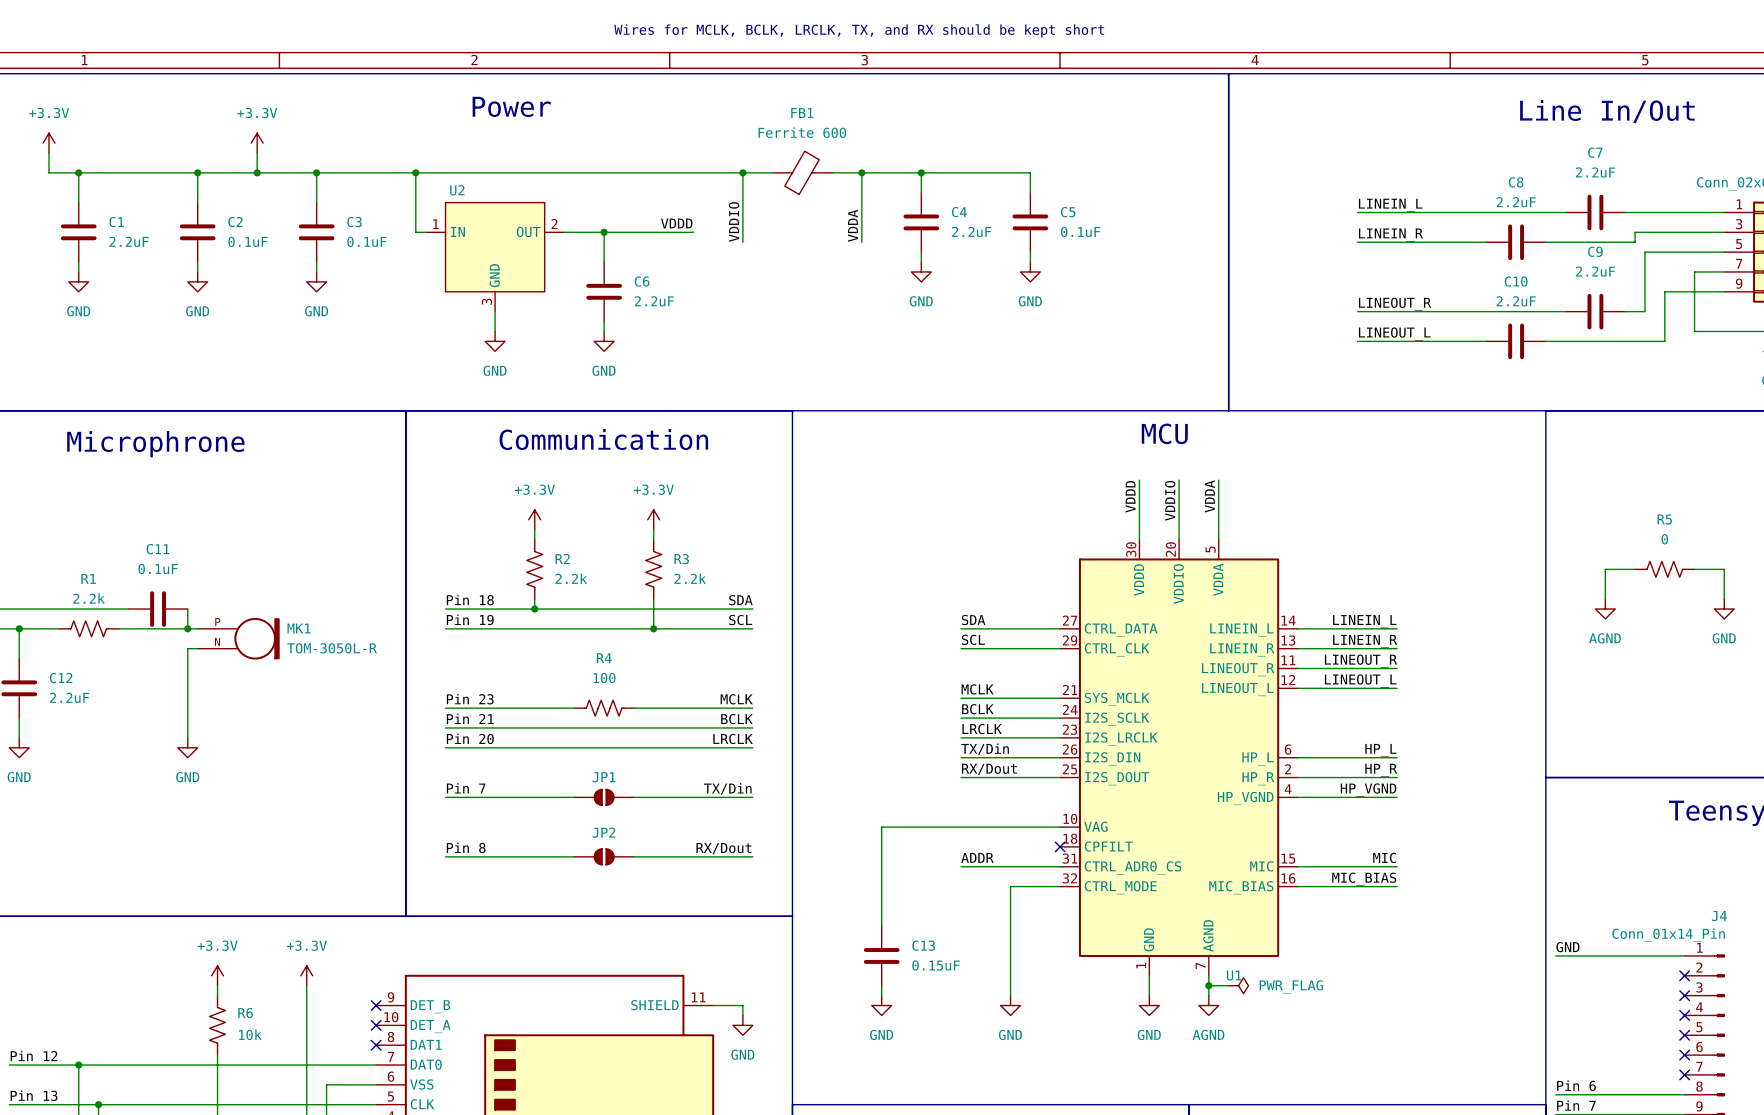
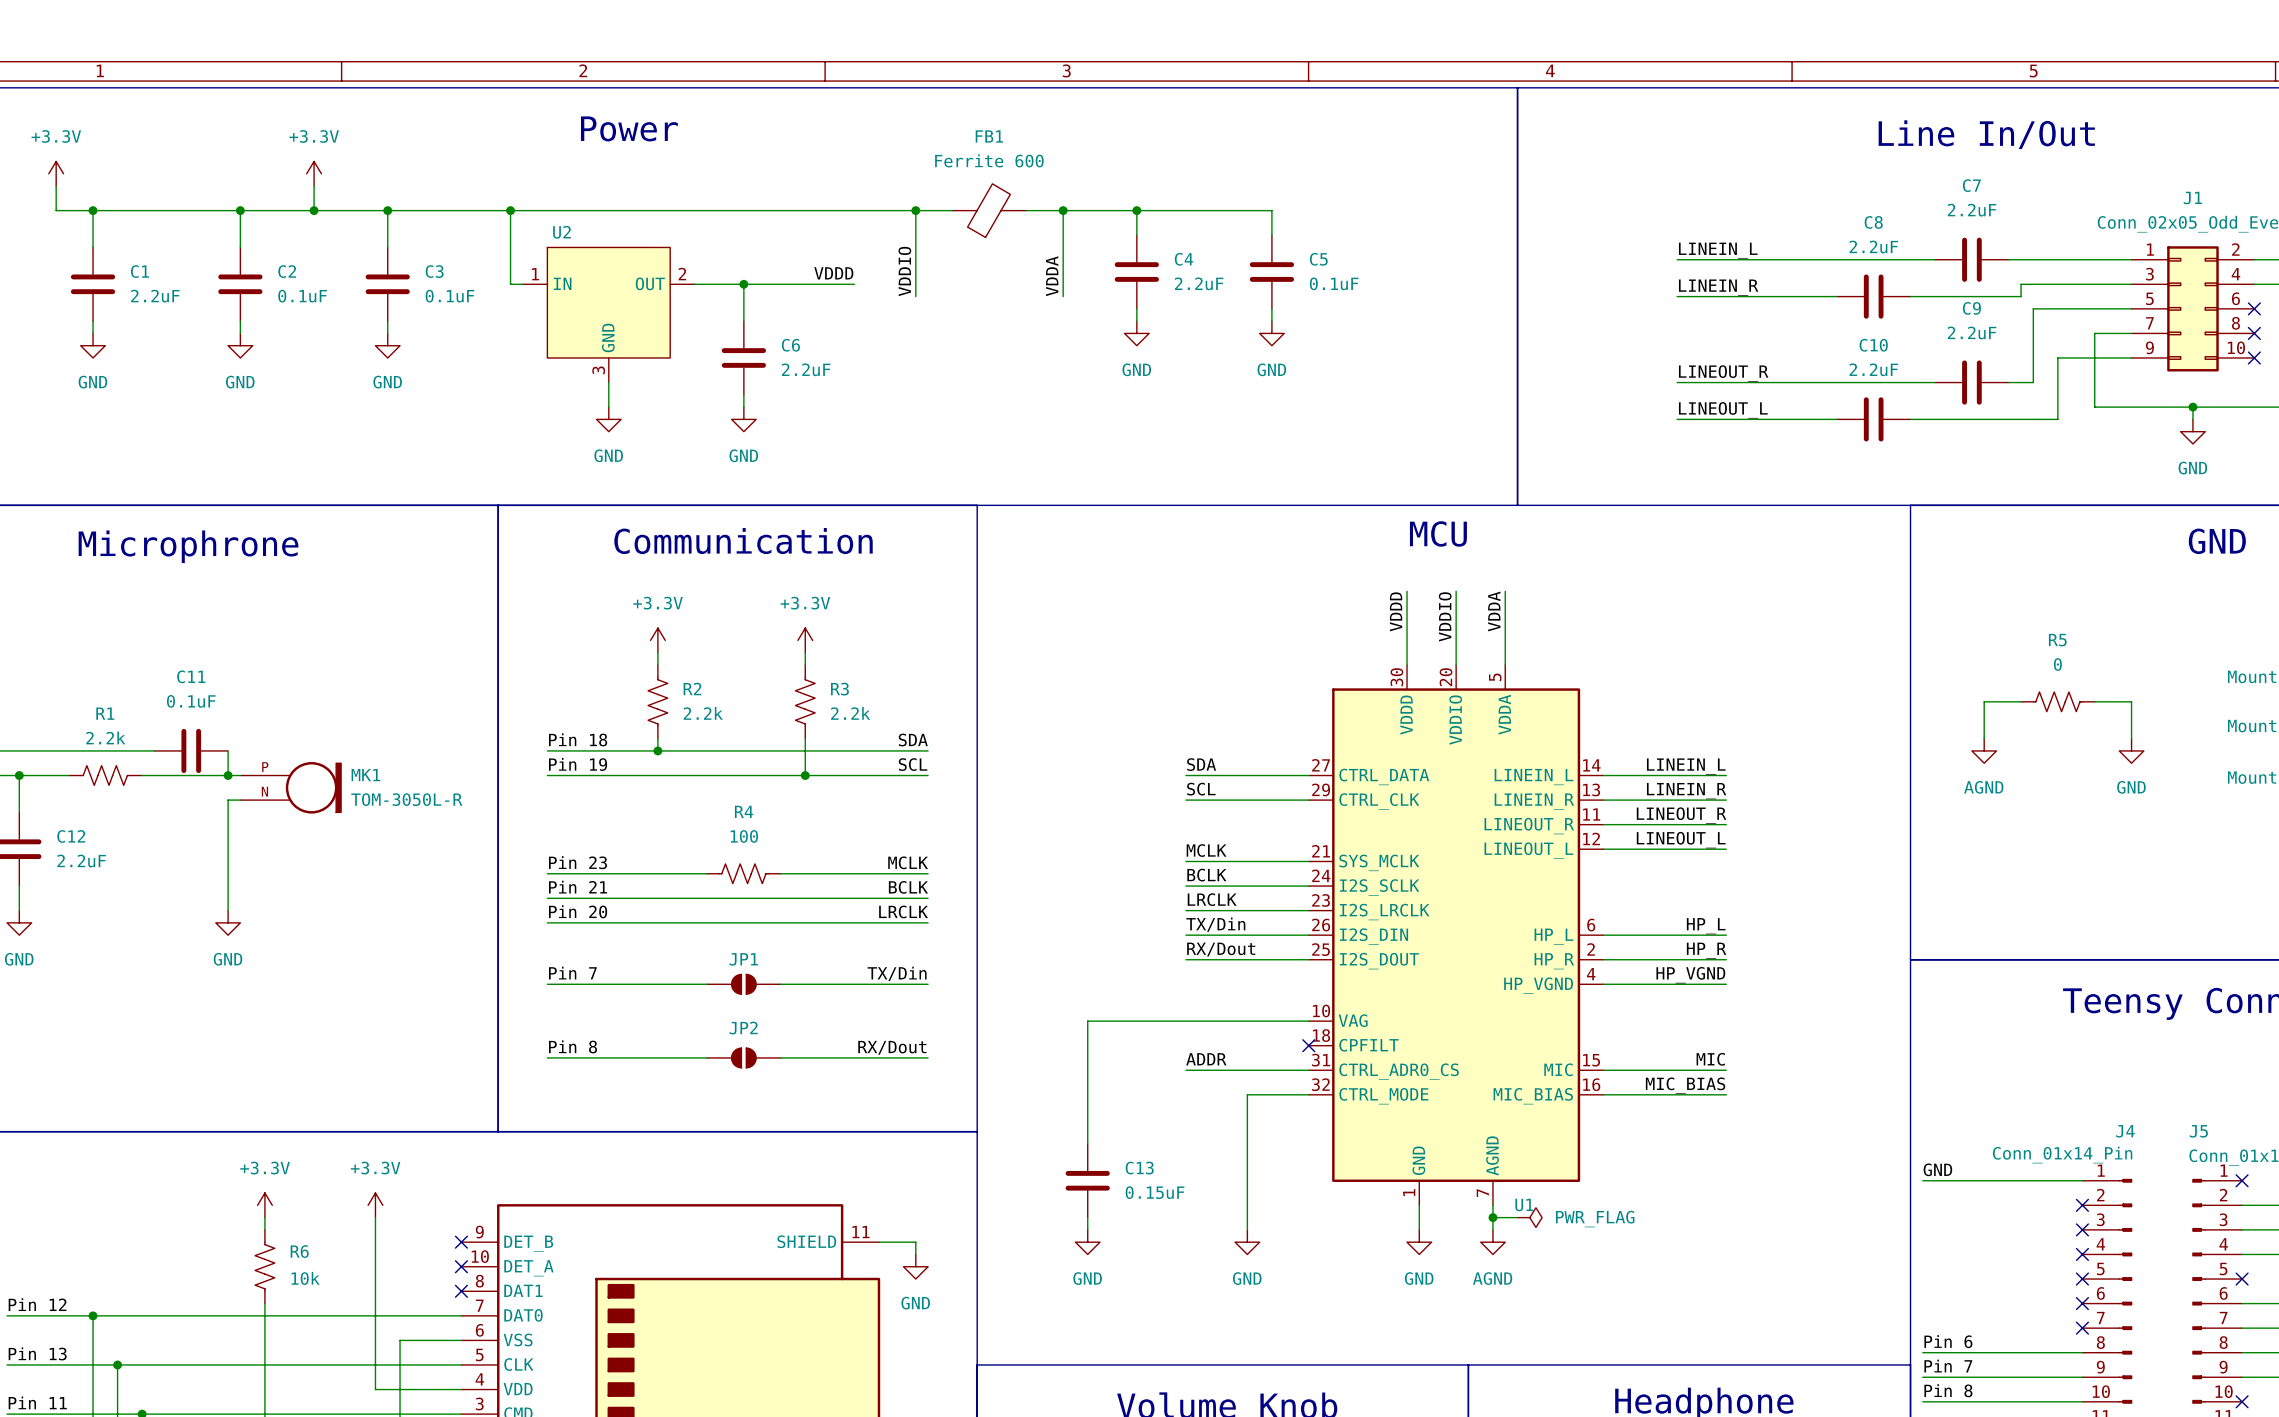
text: Wires for MCLK, BCLK, LRCLK, TX, and RX should be kept short (859, 30) -> none

